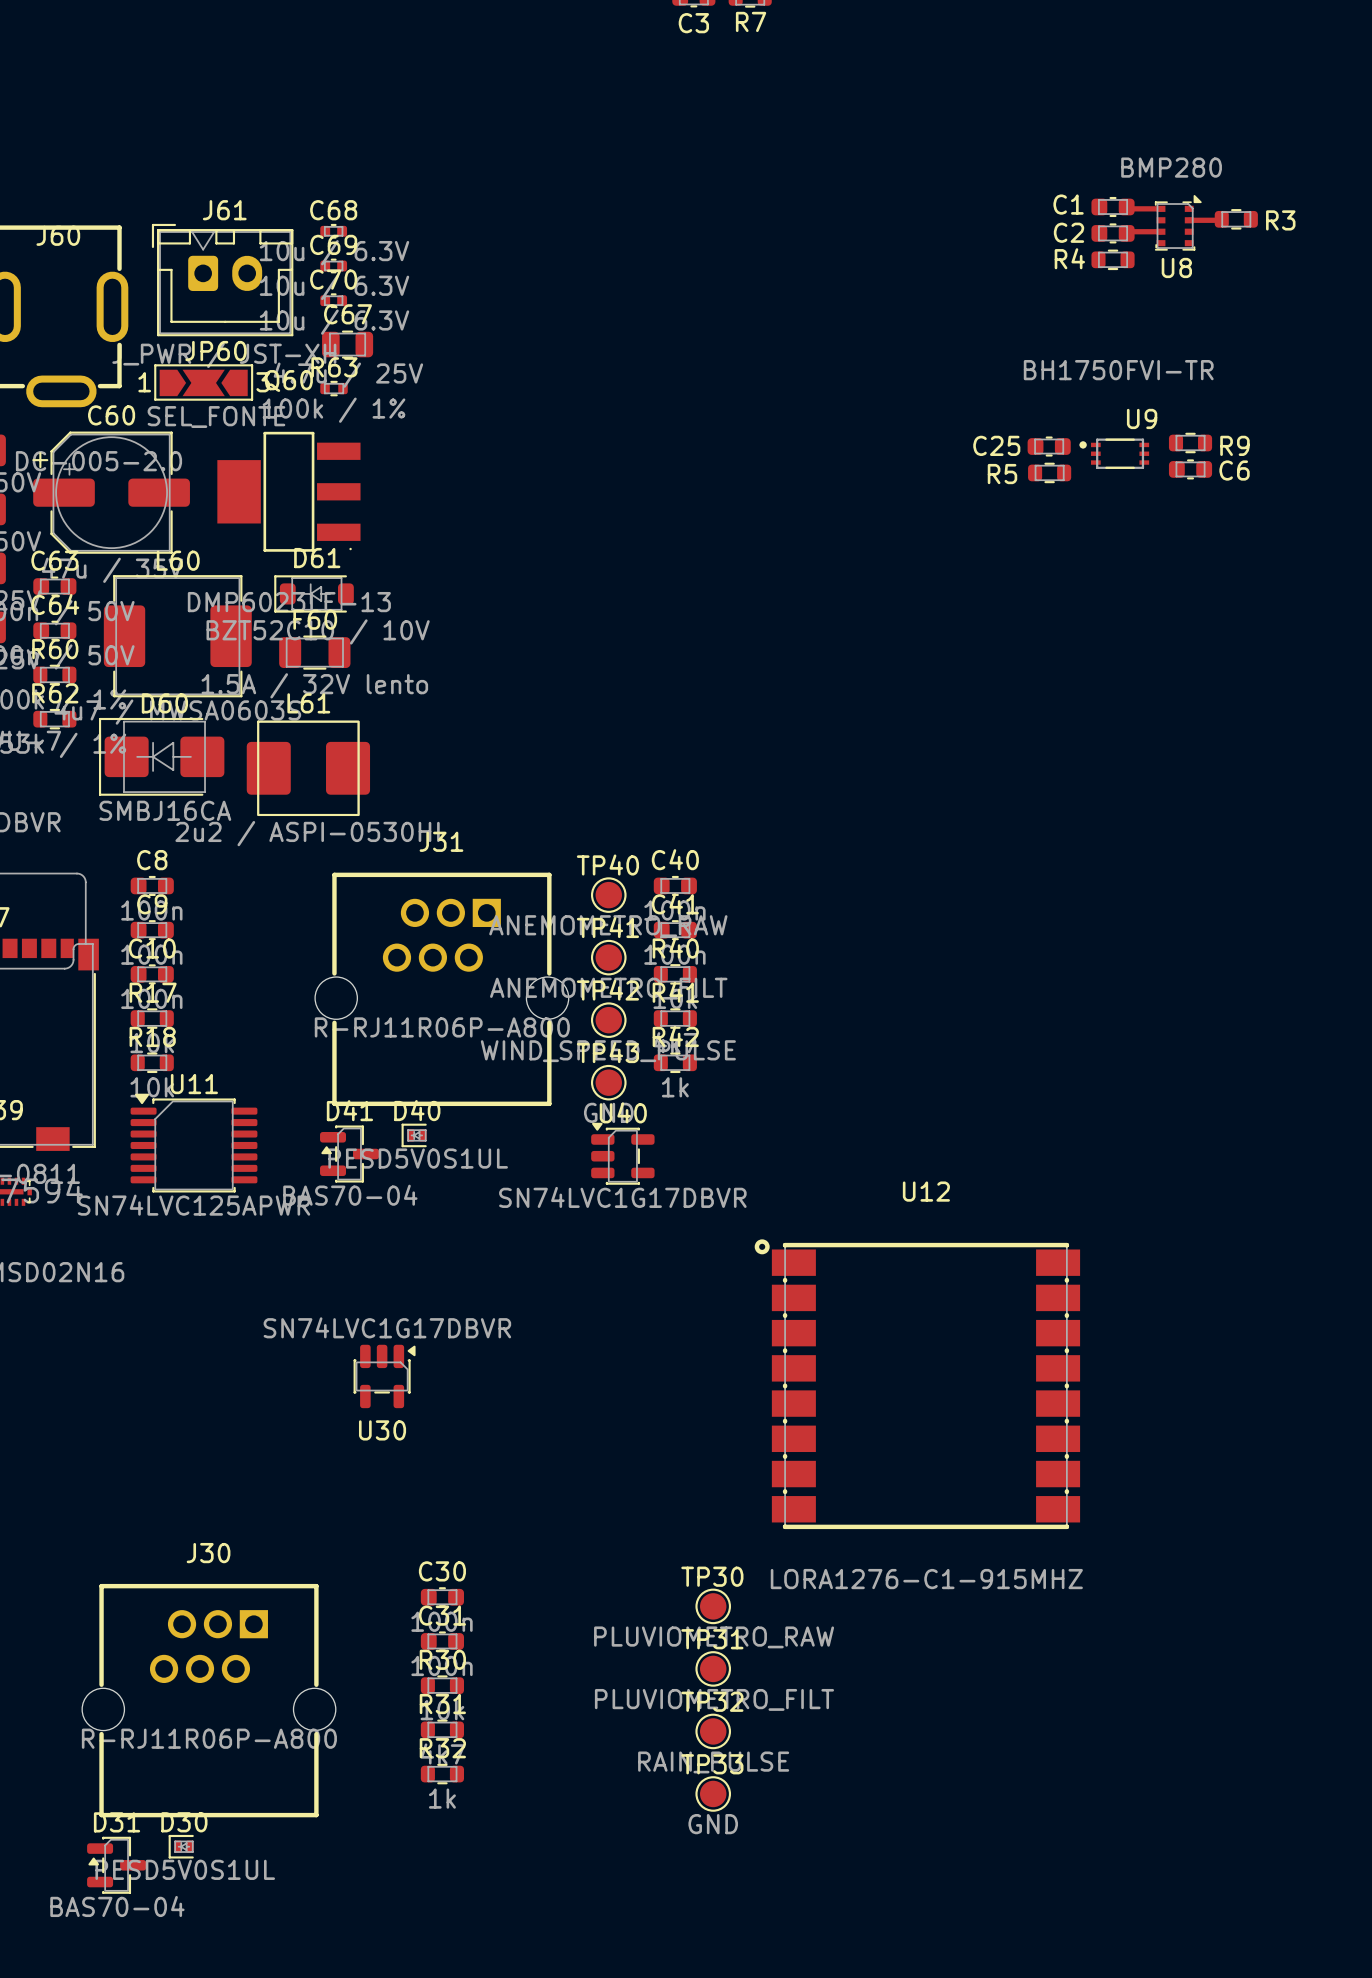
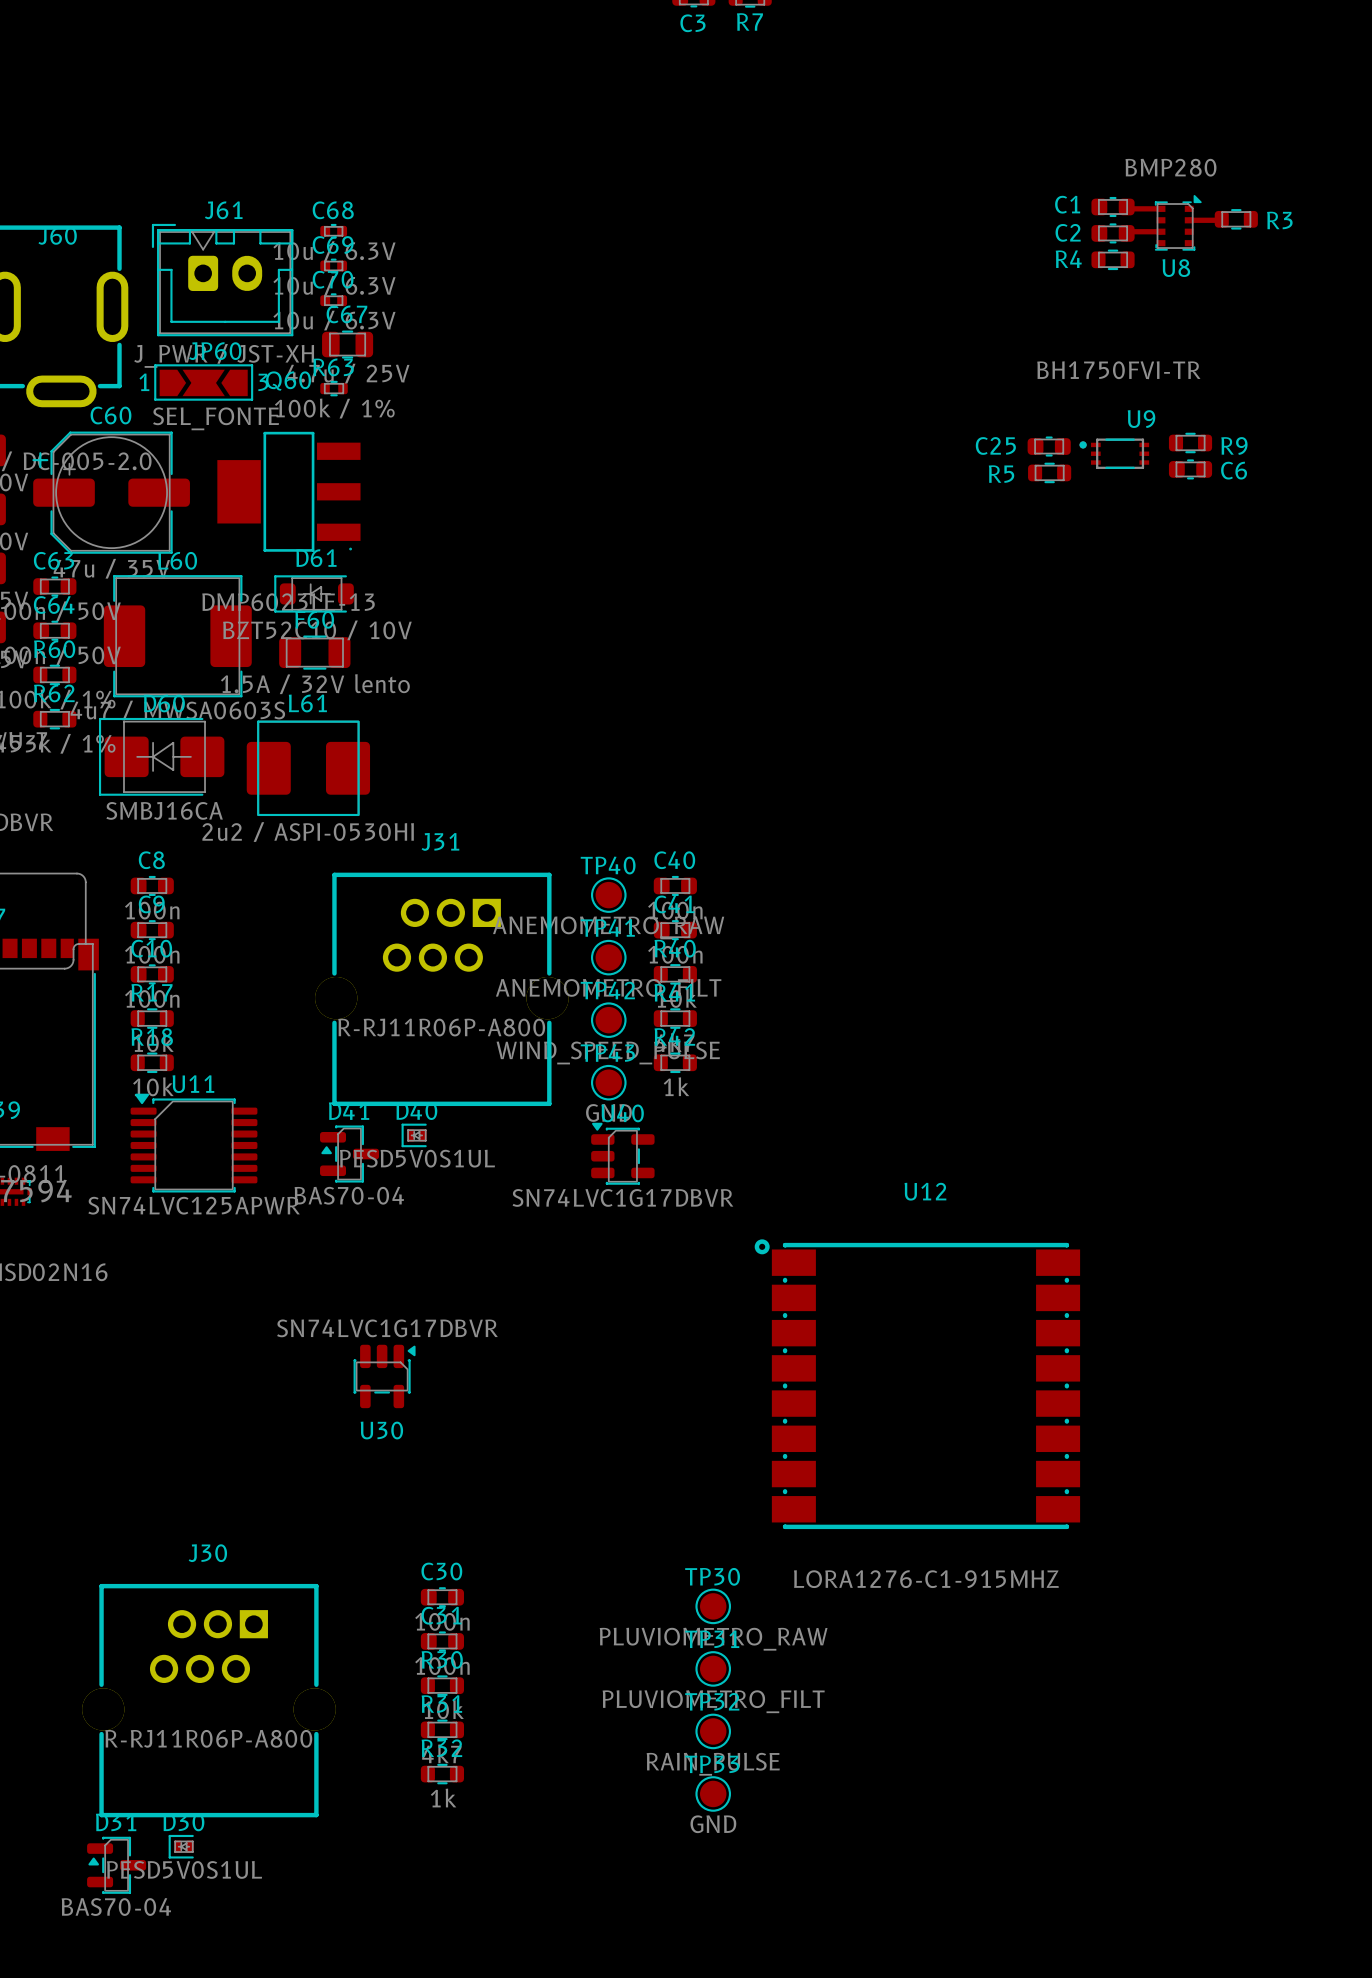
J31 footprint: [315, 872, 569, 1107] -> [315, 872, 569, 1107]
U12 footprint: [754, 1239, 1081, 1530] -> [754, 1239, 1081, 1530]
J30 footprint: [82, 1583, 336, 1818] -> [82, 1583, 336, 1818]

